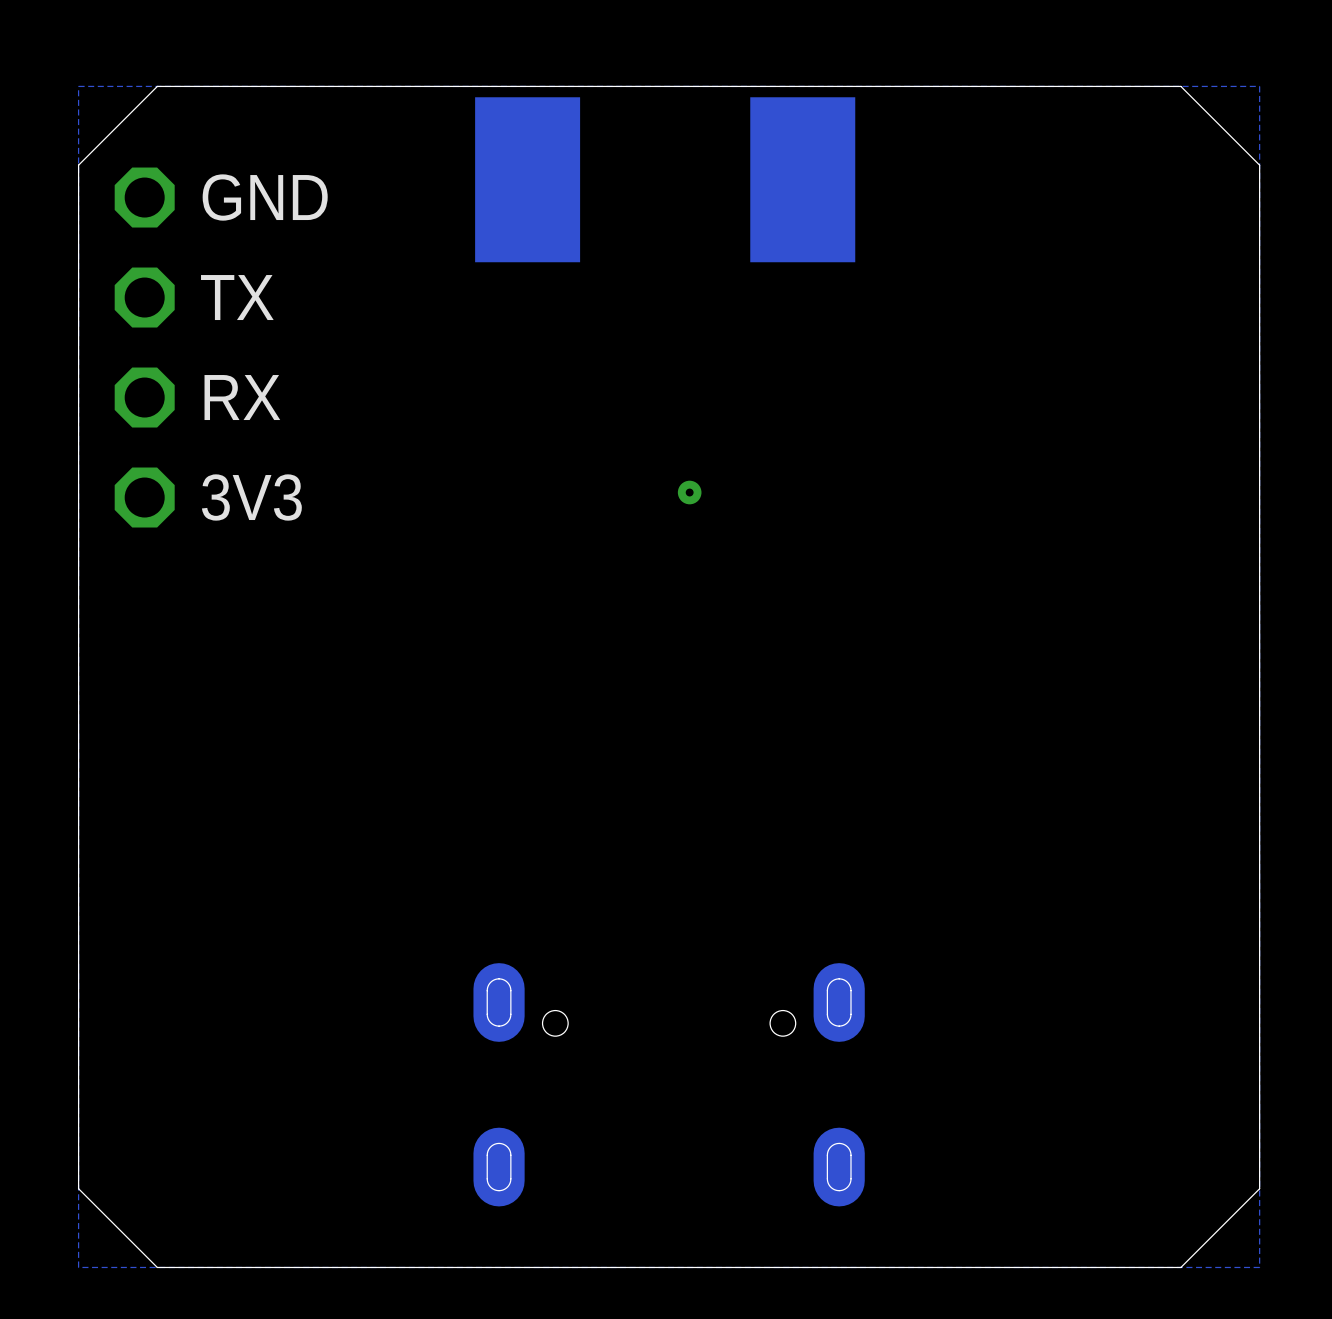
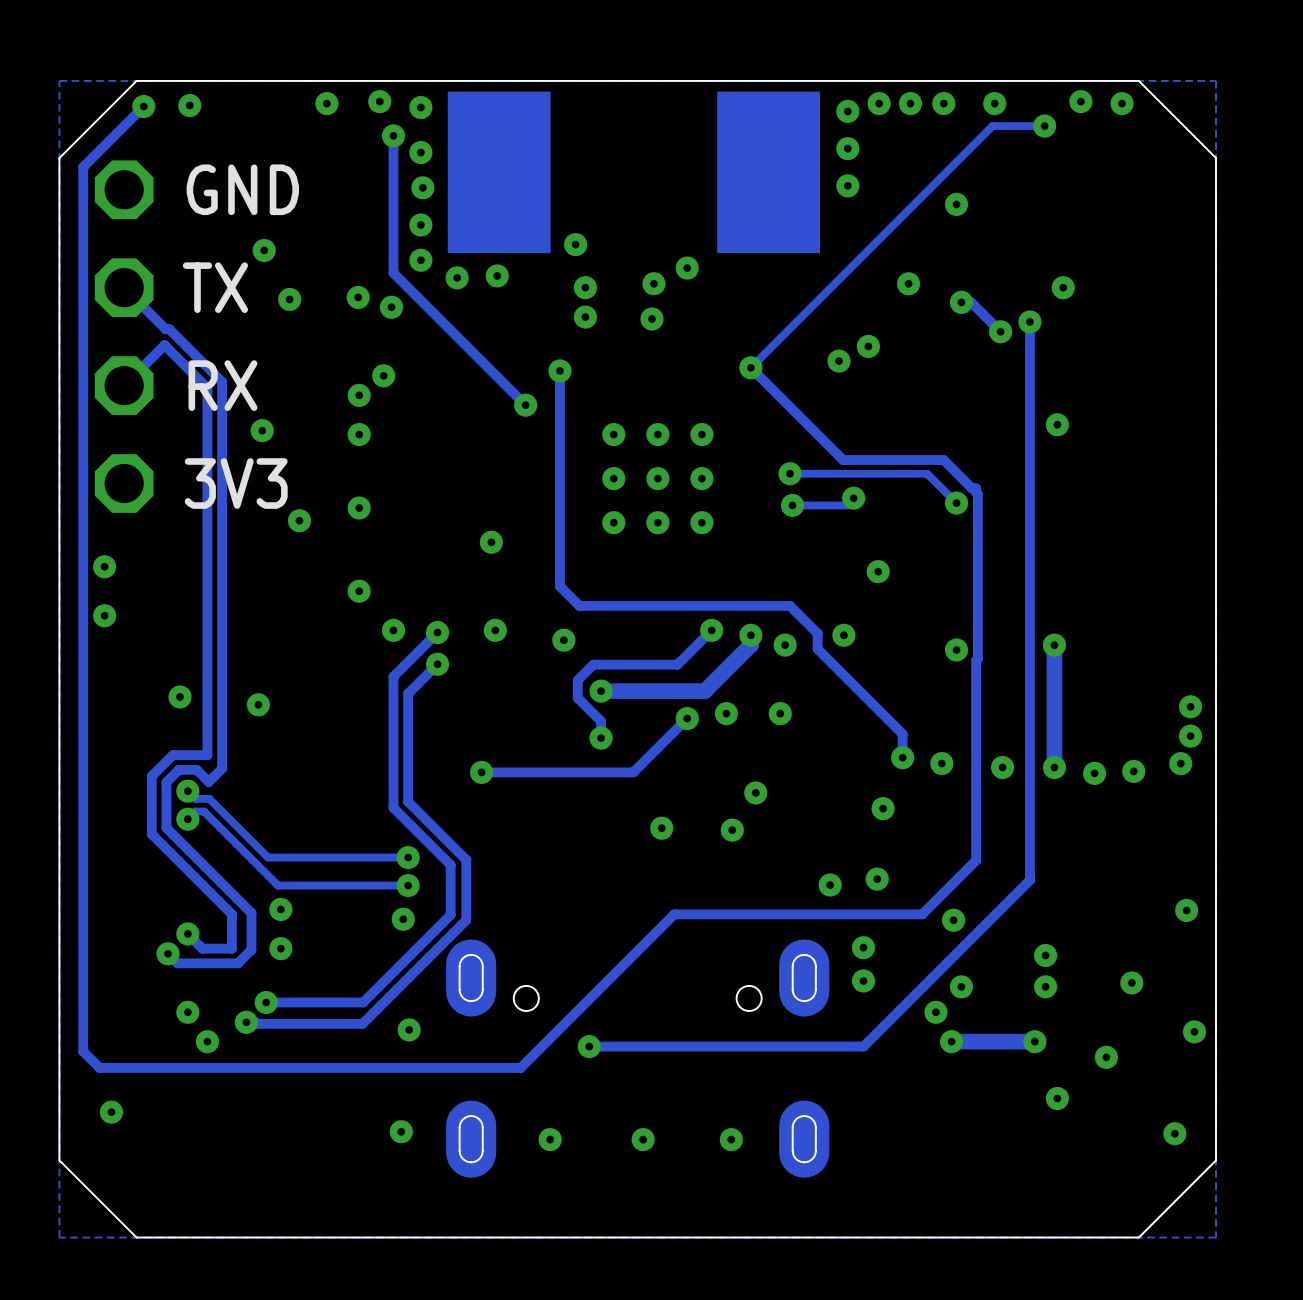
via: none -> (379, 101)
via: none -> (1080, 101)
via: none -> (326, 103)
via: none -> (879, 103)
via: none -> (910, 103)
via: none -> (943, 103)
via: none -> (994, 103)
via: none -> (1121, 103)
via: none -> (189, 105)
track: none -> (143, 106) (83, 167) (83, 1051) (99, 1067) (520, 1067) (674, 914) (922, 914) (976, 860) (976, 660) (977, 658) (977, 494) (976, 488) (972, 488) (943, 460) (843, 460) (750, 367) (992, 126) (1044, 126)
via: none -> (143, 106)
via: none -> (420, 107)
via: none -> (847, 111)
via: none -> (1044, 126)
track: none -> (393, 135) (393, 272) (525, 405)
via: none -> (393, 135)
via: none -> (847, 148)
via: none -> (420, 152)
via: none -> (847, 185)
via: none -> (422, 187)
via: none -> (956, 204)
via: none -> (420, 225)
via: none -> (575, 244)
via: none -> (264, 250)
via: none -> (420, 260)
via: none -> (687, 268)
via: none -> (497, 275)
via: none -> (457, 277)
via: none -> (653, 283)
via: none -> (908, 283)
track: none -> (124, 287) (222, 381) (222, 768) (208, 781) (196, 769) (178, 769) (166, 782) (166, 828) (251, 913) (251, 949) (237, 963) (177, 963) (168, 953)
via: none -> (585, 287)
via: none -> (1063, 287)
via: none -> (358, 297)
via: none -> (289, 299)
track: none -> (961, 302) (971, 302) (1000, 331)
via: none -> (961, 302)
via: none -> (391, 307)
via: none -> (585, 317)
via: none -> (651, 319)
track: none -> (1029, 321) (1029, 880) (863, 1046) (589, 1046)
via: none -> (1029, 321)
via: none -> (1000, 331)
via: none -> (868, 346)
via: none -> (839, 361)
via: none -> (750, 367)
track: none -> (559, 370) (559, 586) (579, 605) (790, 605) (817, 633) (817, 649) (902, 734) (902, 757)
via: none -> (559, 370)
via: none -> (383, 375)
track: none -> (124, 385) (164, 345) (207, 388) (207, 755) (172, 755) (151, 776) (151, 834) (231, 914) (231, 948) (202, 948) (187, 933)
via: none -> (359, 395)
via: none -> (525, 405)
via: none -> (1057, 424)
via: none -> (262, 430)
via: none -> (359, 434)
via: none -> (613, 434)
via: none -> (657, 434)
via: none -> (701, 434)
track: none -> (790, 473) (927, 473) (956, 503)
via: none -> (790, 473)
via: none -> (613, 478)
via: none -> (701, 478)
track: none -> (853, 498) (846, 505) (792, 505)
via: none -> (853, 498)
via: none -> (956, 503)
via: none -> (792, 505)
via: none -> (359, 508)
via: none -> (299, 520)
via: none -> (613, 522)
via: none -> (657, 522)
via: none -> (701, 522)
via: none -> (491, 542)
via: none -> (104, 566)
via: none -> (878, 571)
via: none -> (359, 591)
via: none -> (104, 615)
via: none -> (393, 630)
via: none -> (495, 630)
track: none -> (711, 630) (677, 664) (593, 664) (577, 680) (577, 698) (601, 721) (601, 738)
via: none -> (711, 630)
track: none -> (437, 632) (393, 676) (393, 807) (450, 865) (450, 914) (363, 1002) (266, 1002)
via: none -> (437, 632)
track: none -> (750, 635) (750, 645) (704, 691) (601, 691)
via: none -> (750, 635)
via: none -> (843, 635)
via: none -> (563, 640)
via: none -> (785, 645)
track: none -> (1054, 645) (1054, 767)
via: none -> (1054, 645)
via: none -> (956, 649)
track: none -> (437, 664) (408, 693) (408, 801) (466, 859) (466, 920) (362, 1023) (246, 1022)
via: none -> (437, 664)
via: none -> (601, 691)
via: none -> (179, 696)
via: none -> (258, 704)
via: none -> (1190, 706)
via: none -> (726, 713)
via: none -> (780, 713)
track: none -> (687, 718) (633, 772) (481, 772)
via: none -> (687, 718)
via: none -> (1190, 736)
via: none -> (601, 738)
via: none -> (902, 757)
via: none -> (941, 763)
via: none -> (1180, 763)
via: none -> (1002, 767)
via: none -> (1054, 767)
via: none -> (1133, 771)
via: none -> (481, 772)
via: none -> (1094, 773)
track: none -> (187, 791) (195, 798) (209, 798) (268, 857) (408, 857)
via: none -> (187, 791)
via: none -> (755, 792)
via: none -> (883, 808)
track: none -> (187, 819) (195, 811) (204, 811) (278, 885) (408, 885)
via: none -> (187, 819)
via: none -> (661, 828)
via: none -> (732, 830)
via: none -> (408, 857)
via: none -> (877, 879)
via: none -> (830, 885)
via: none -> (408, 885)
via: none -> (280, 909)
via: none -> (1186, 910)
via: none -> (403, 919)
via: none -> (953, 920)
via: none -> (187, 933)
via: none -> (863, 947)
via: none -> (280, 948)
via: none -> (168, 953)
via: none -> (1045, 955)
via: none -> (863, 980)
via: none -> (1131, 982)
via: none -> (961, 986)
via: none -> (1045, 986)
via: none -> (266, 1002)
via: none -> (187, 1012)
via: none -> (935, 1012)
via: none -> (246, 1022)
via: none -> (409, 1029)
via: none -> (1194, 1031)
via: none -> (207, 1041)
via: none -> (951, 1041)
track: none -> (1034, 1041) (951, 1041)
via: none -> (1034, 1041)
via: none -> (589, 1046)
via: none -> (1106, 1057)
via: none -> (1057, 1098)
via: none -> (111, 1112)
via: none -> (401, 1131)
via: none -> (1174, 1133)
via: none -> (550, 1139)
via: none -> (643, 1139)
via: none -> (731, 1139)

